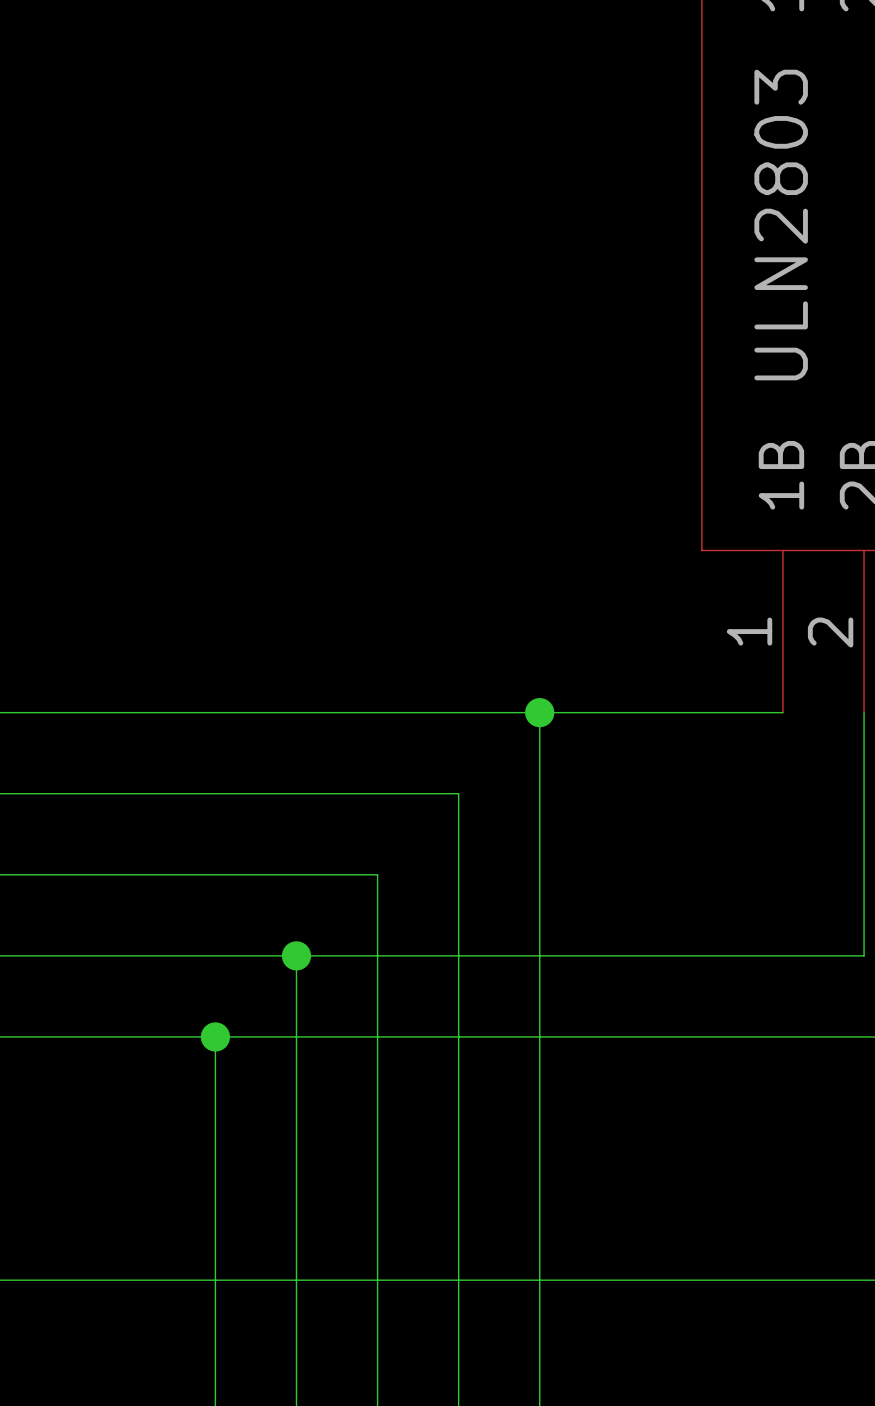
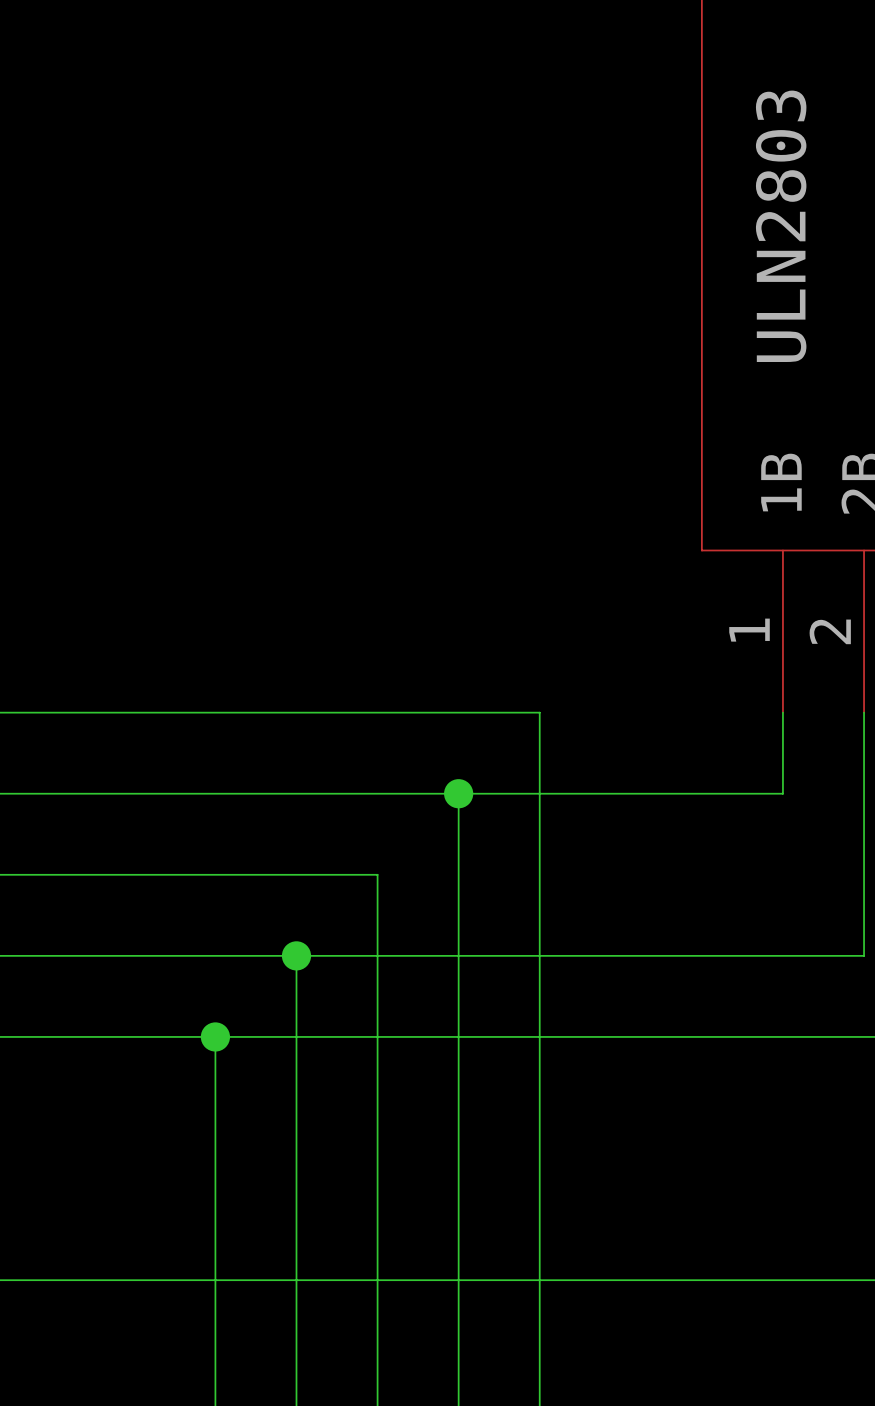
wire: (539, 712) (782, 712) -> (458, 793) (782, 793) (782, 712)
junction position: (539, 712) -> (458, 793)

